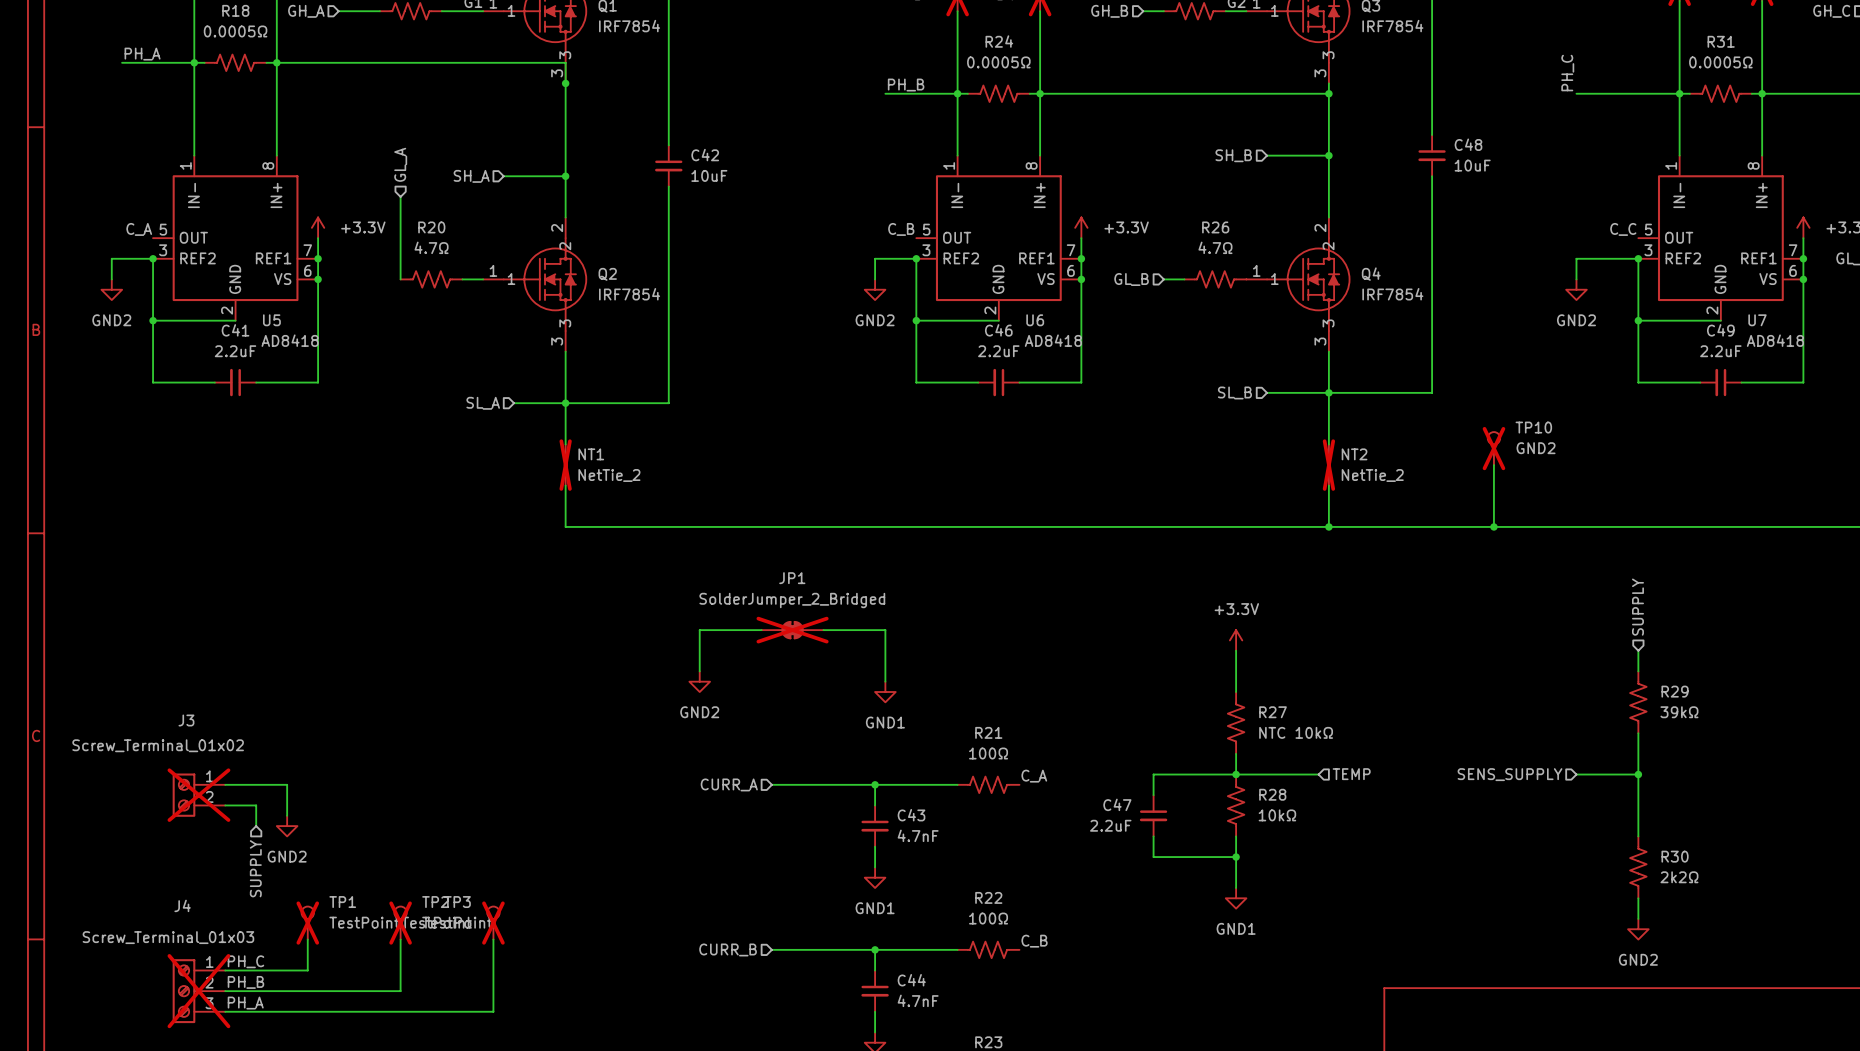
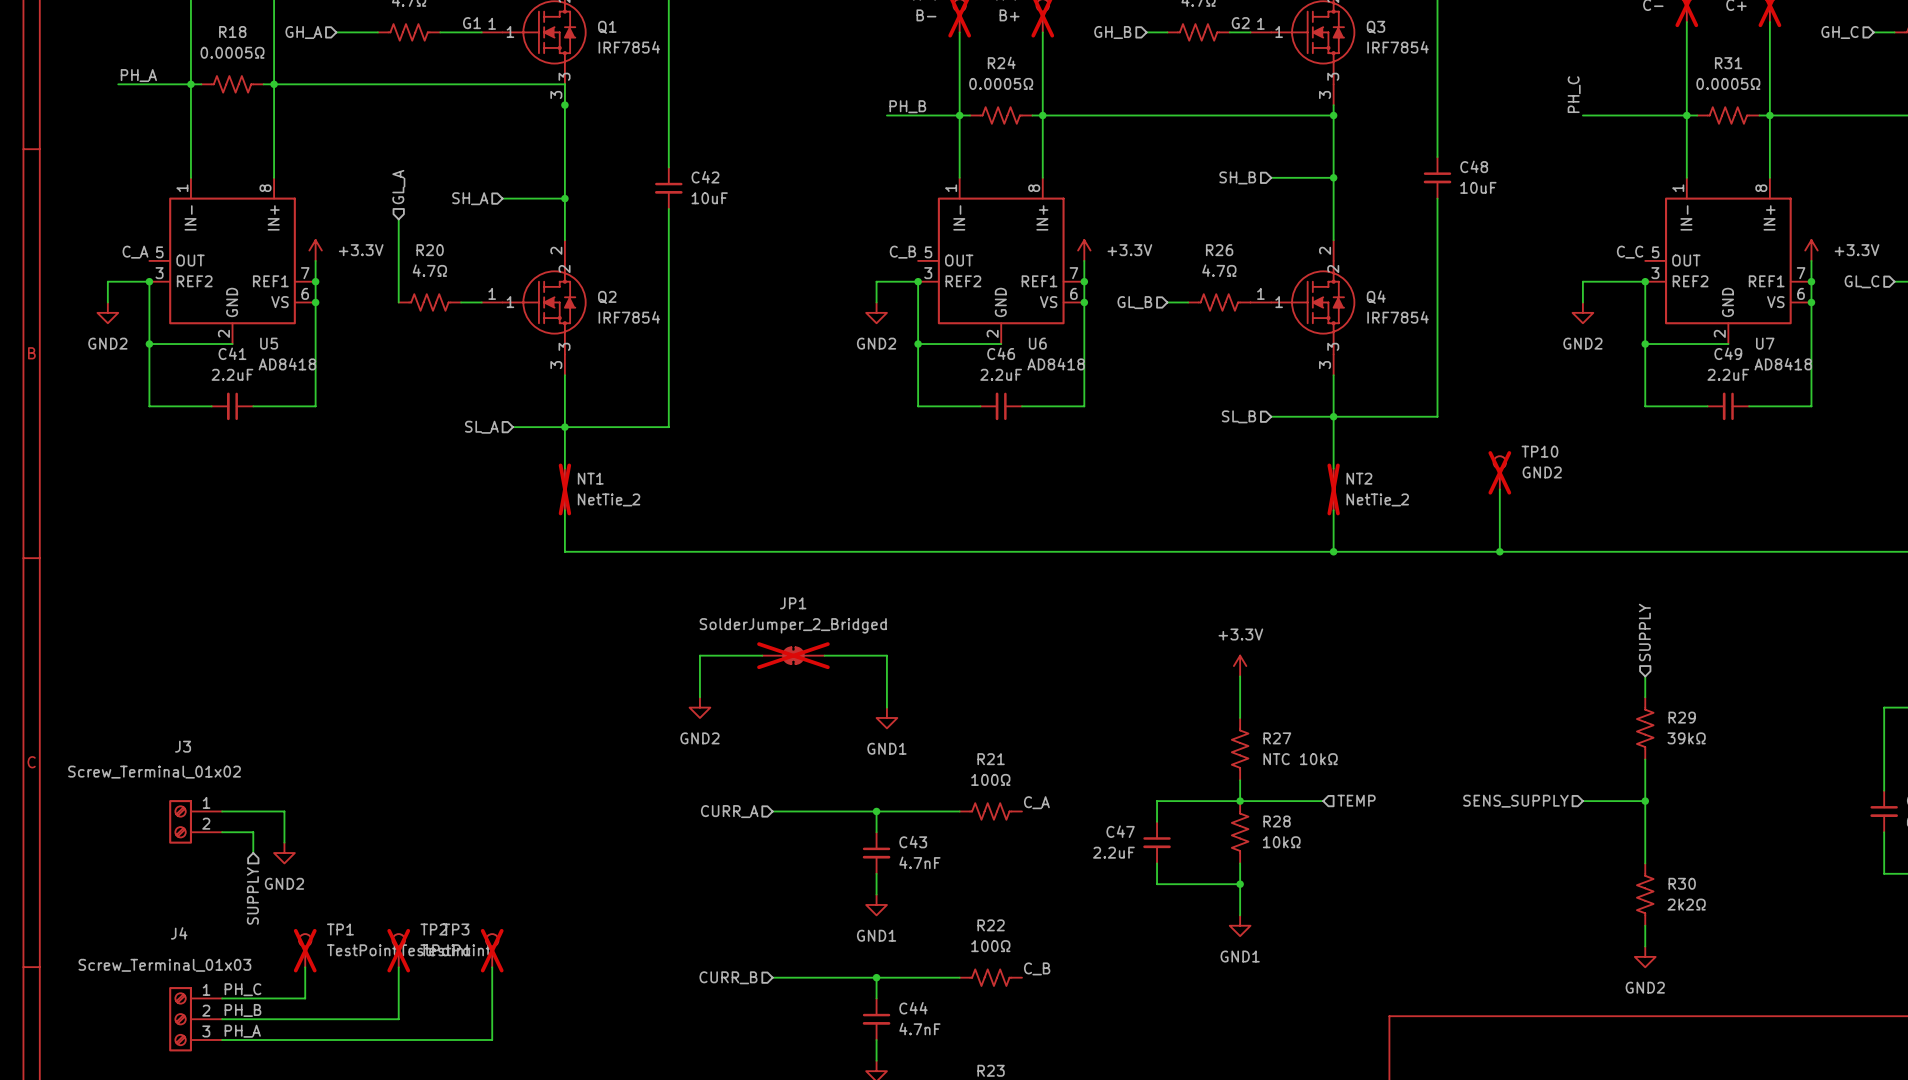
J3 do-not-place cross: (198, 795) -> none
J4 do-not-place cross: (198, 991) -> none

